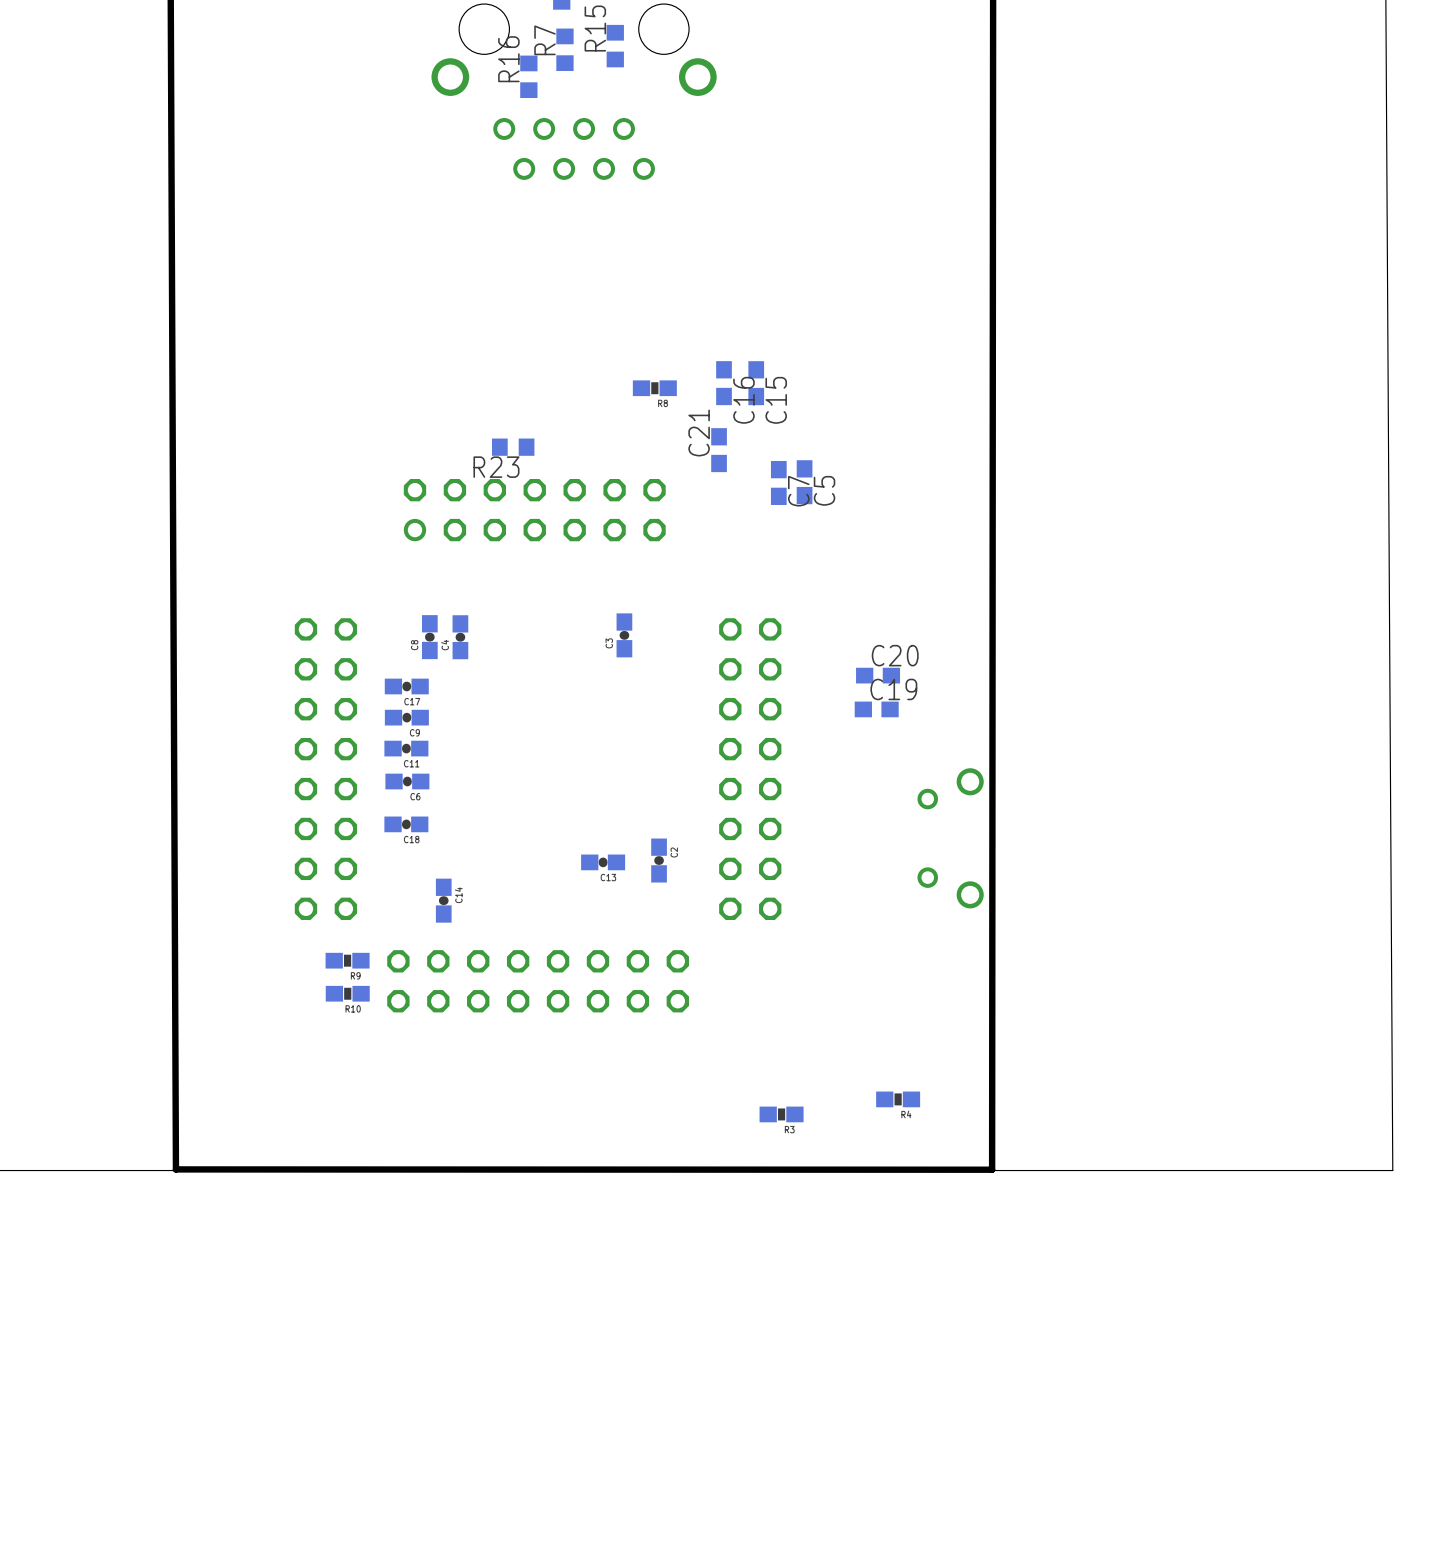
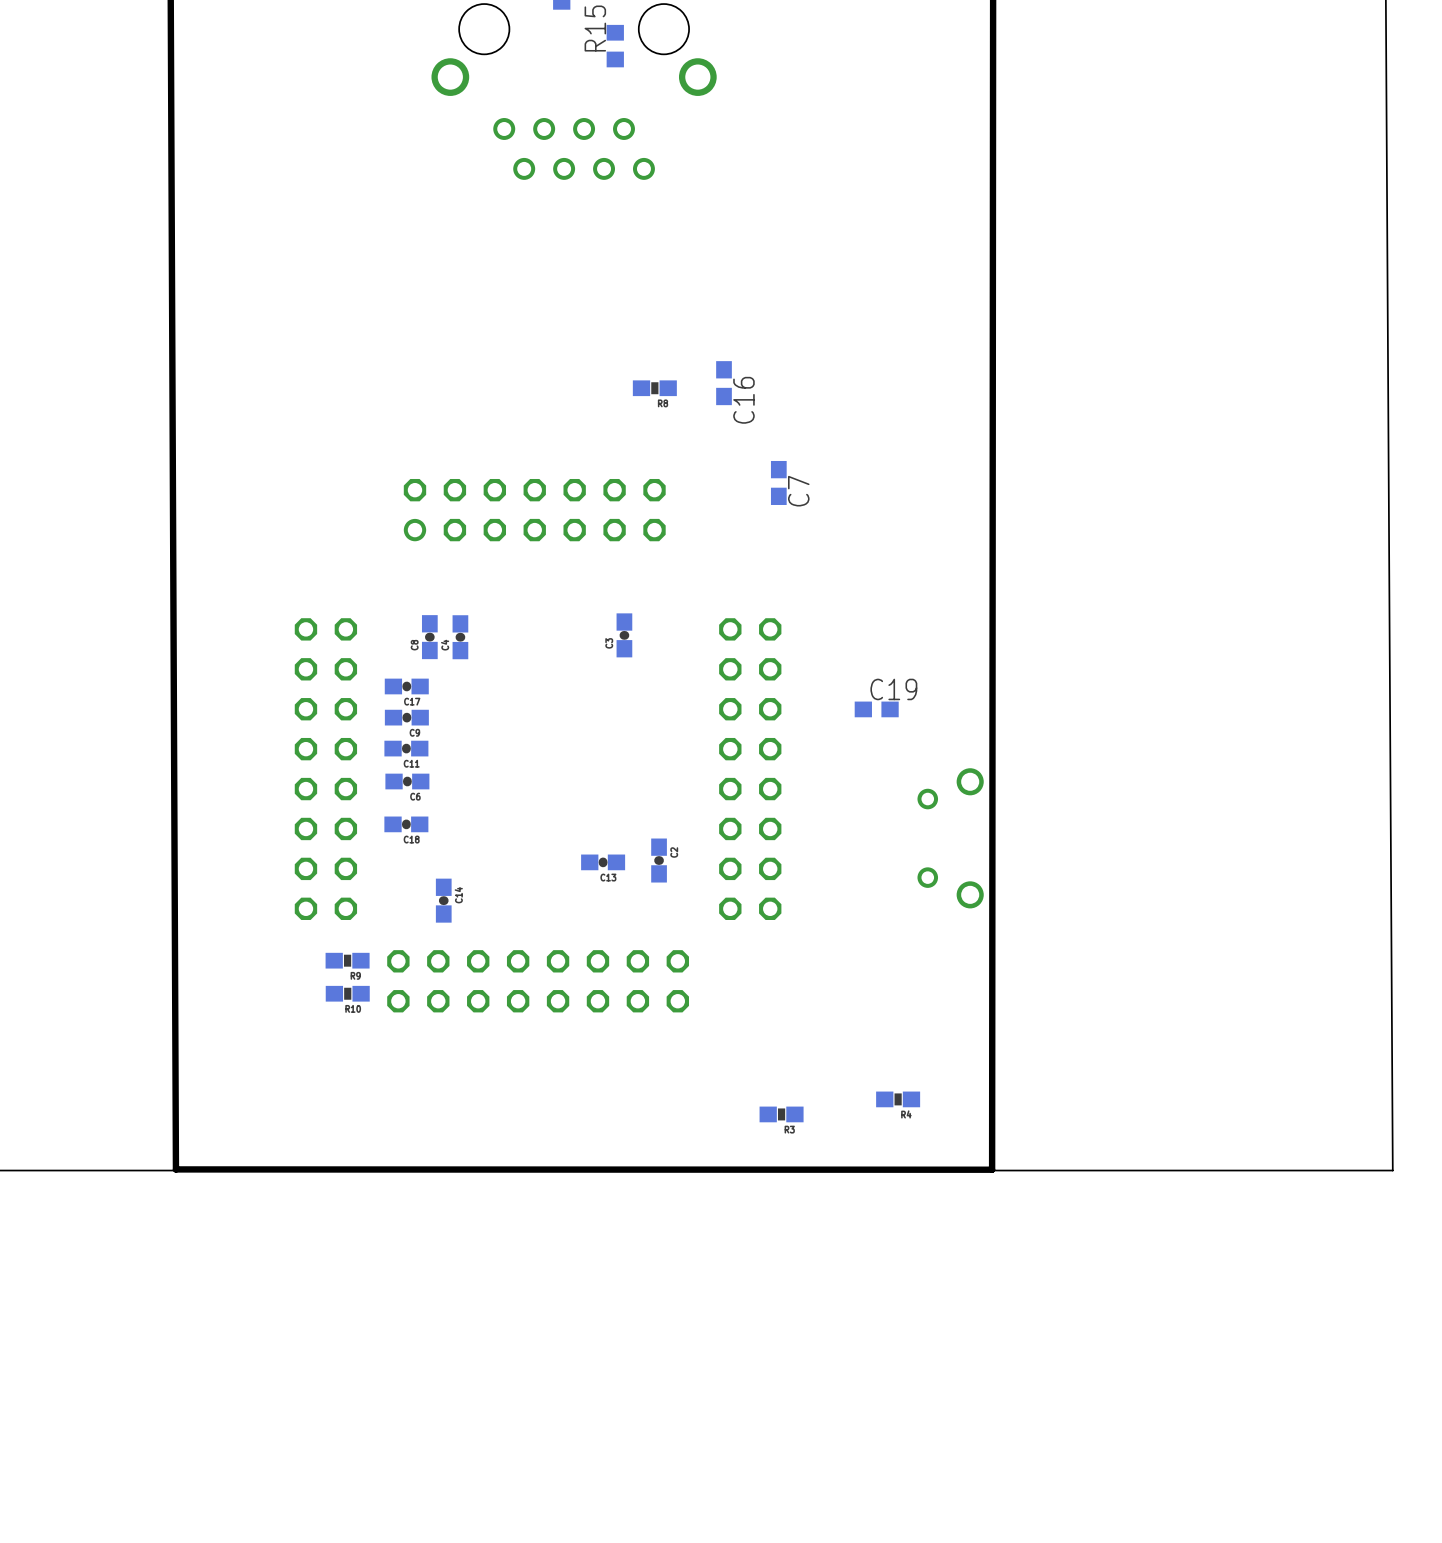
R7: (564, 49) -> none
R16: (528, 76) -> none
C15: (756, 383) -> none
R23: (513, 447) -> none
C21: (719, 450) -> none
C5: (804, 482) -> none
C20: (878, 675) -> none

